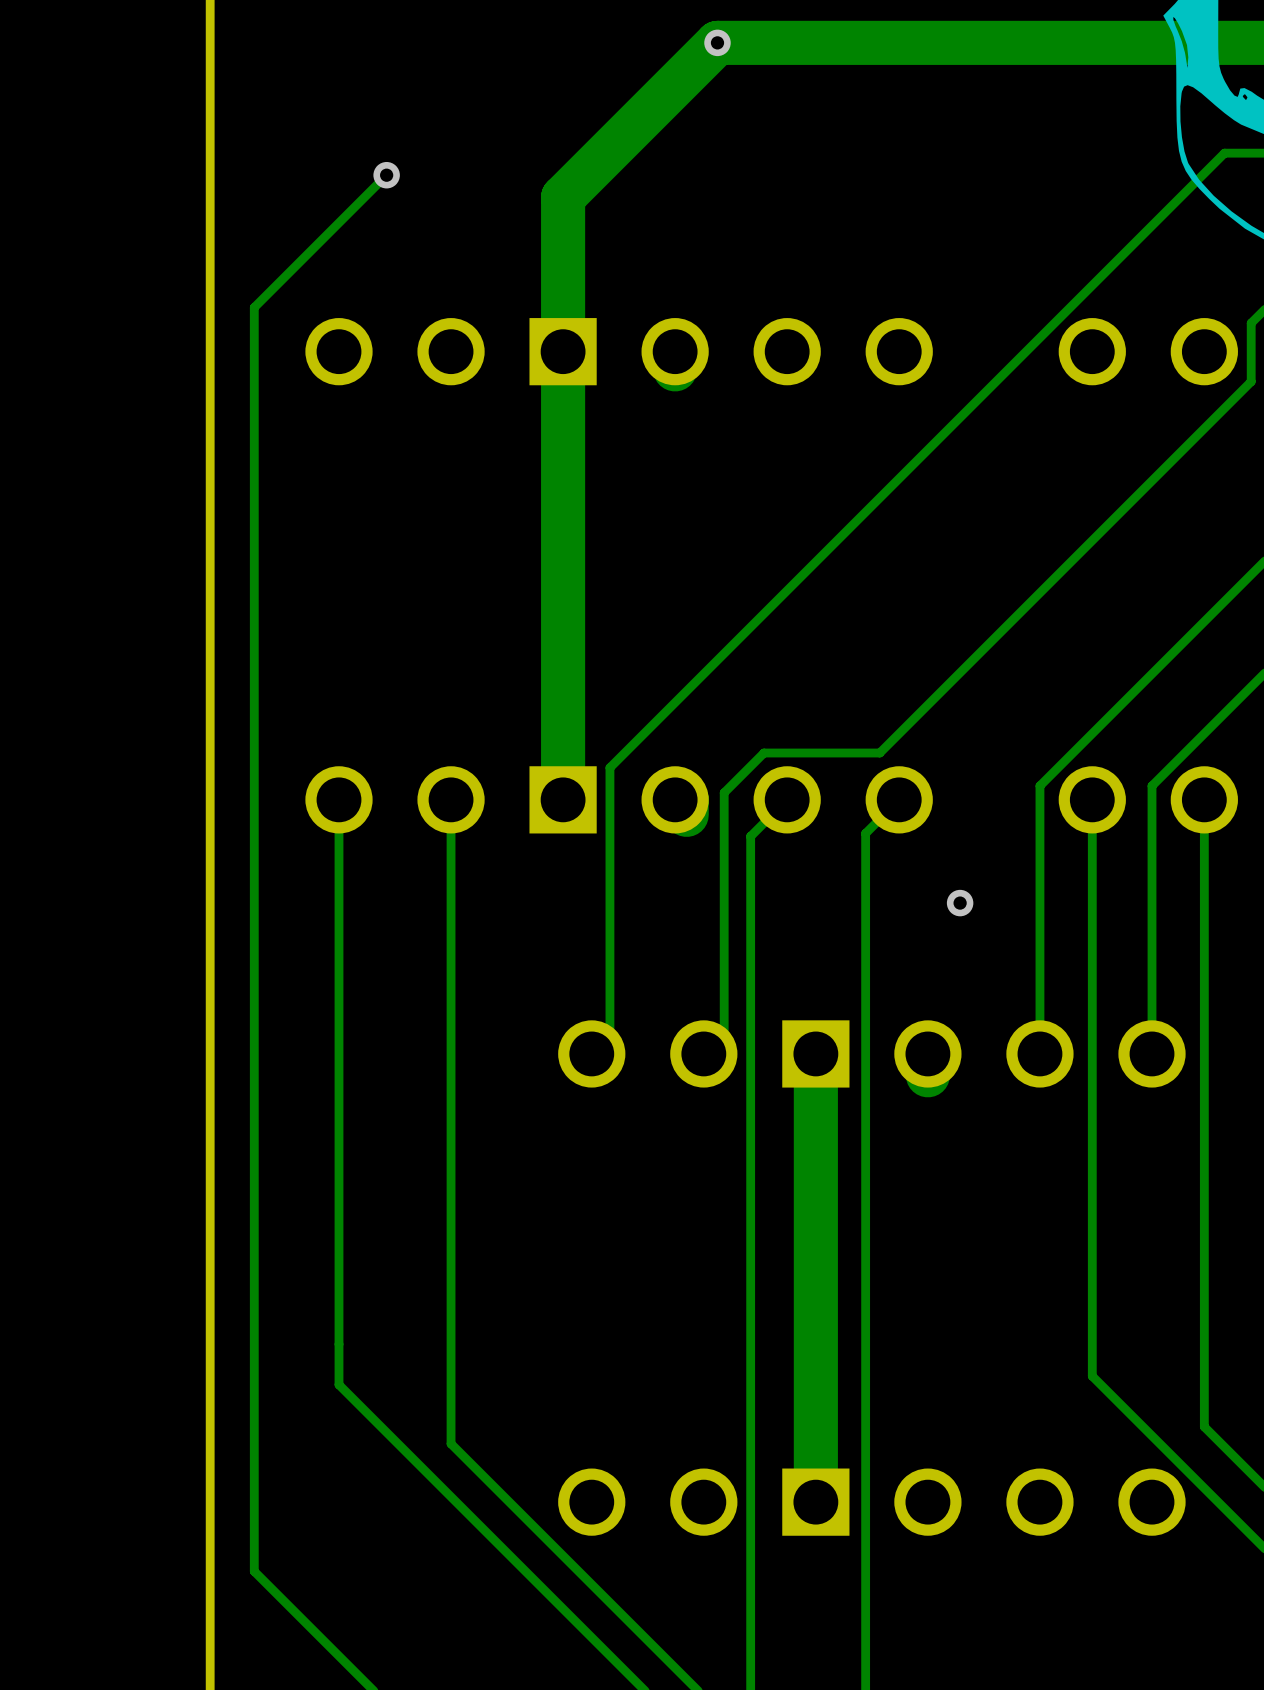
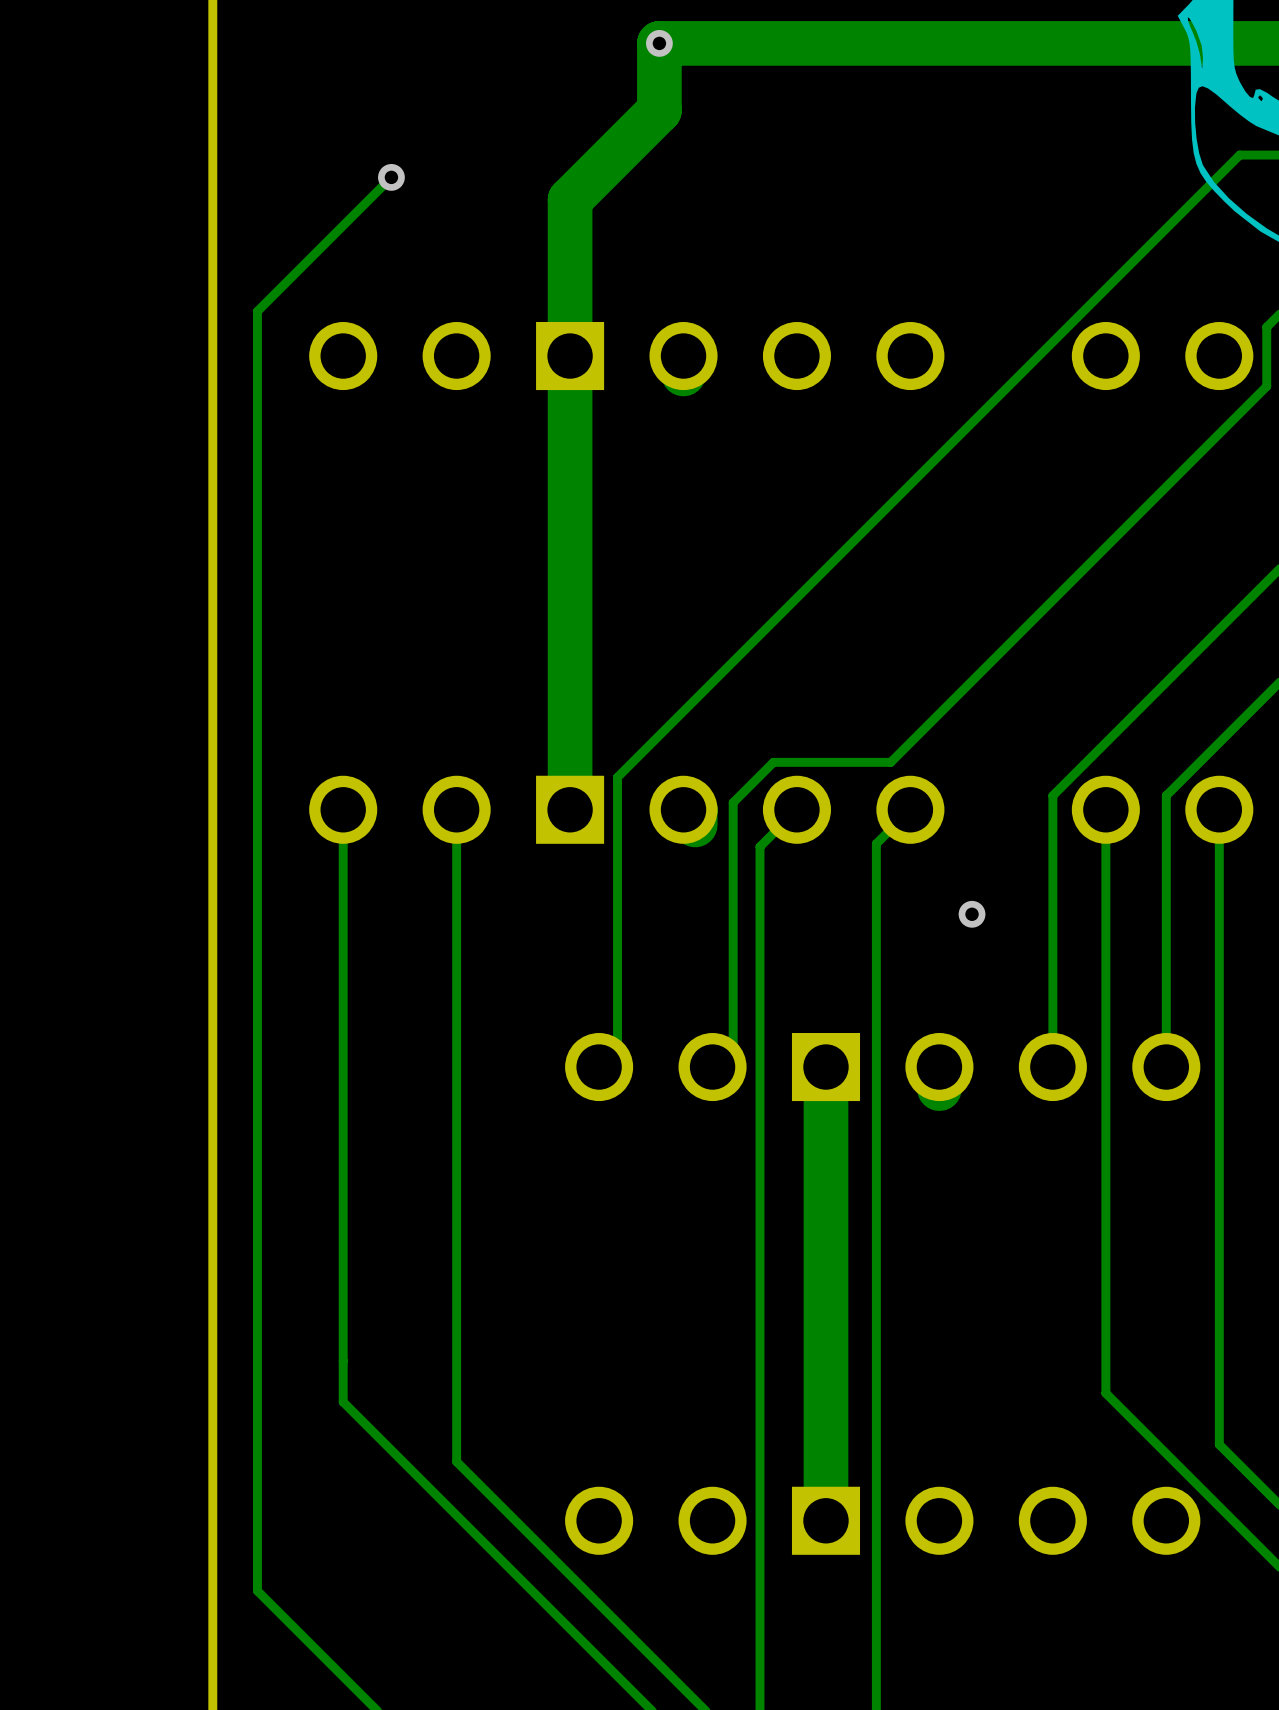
track: (717, 42) (651, 109) -> (726, 43) (659, 43) (659, 110)
via position: (717, 42) -> (659, 43)

